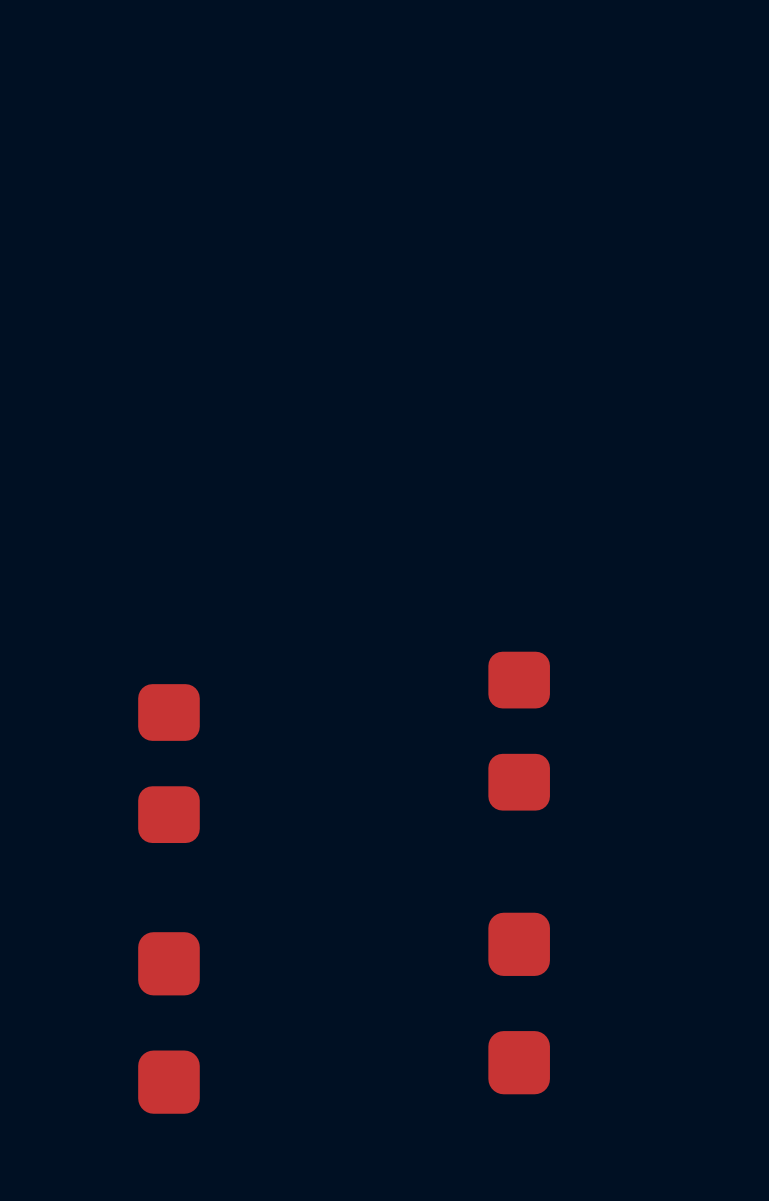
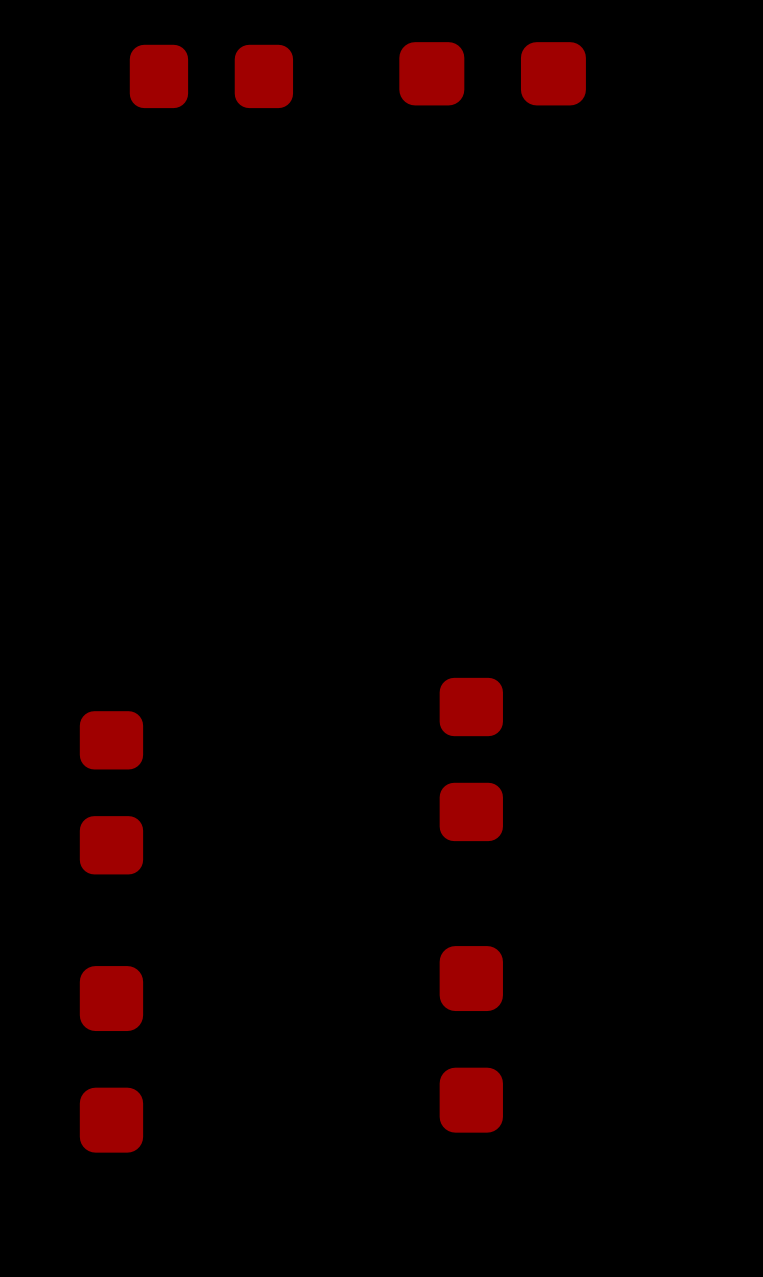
part: none -> (492, 73)
part: none -> (211, 76)

